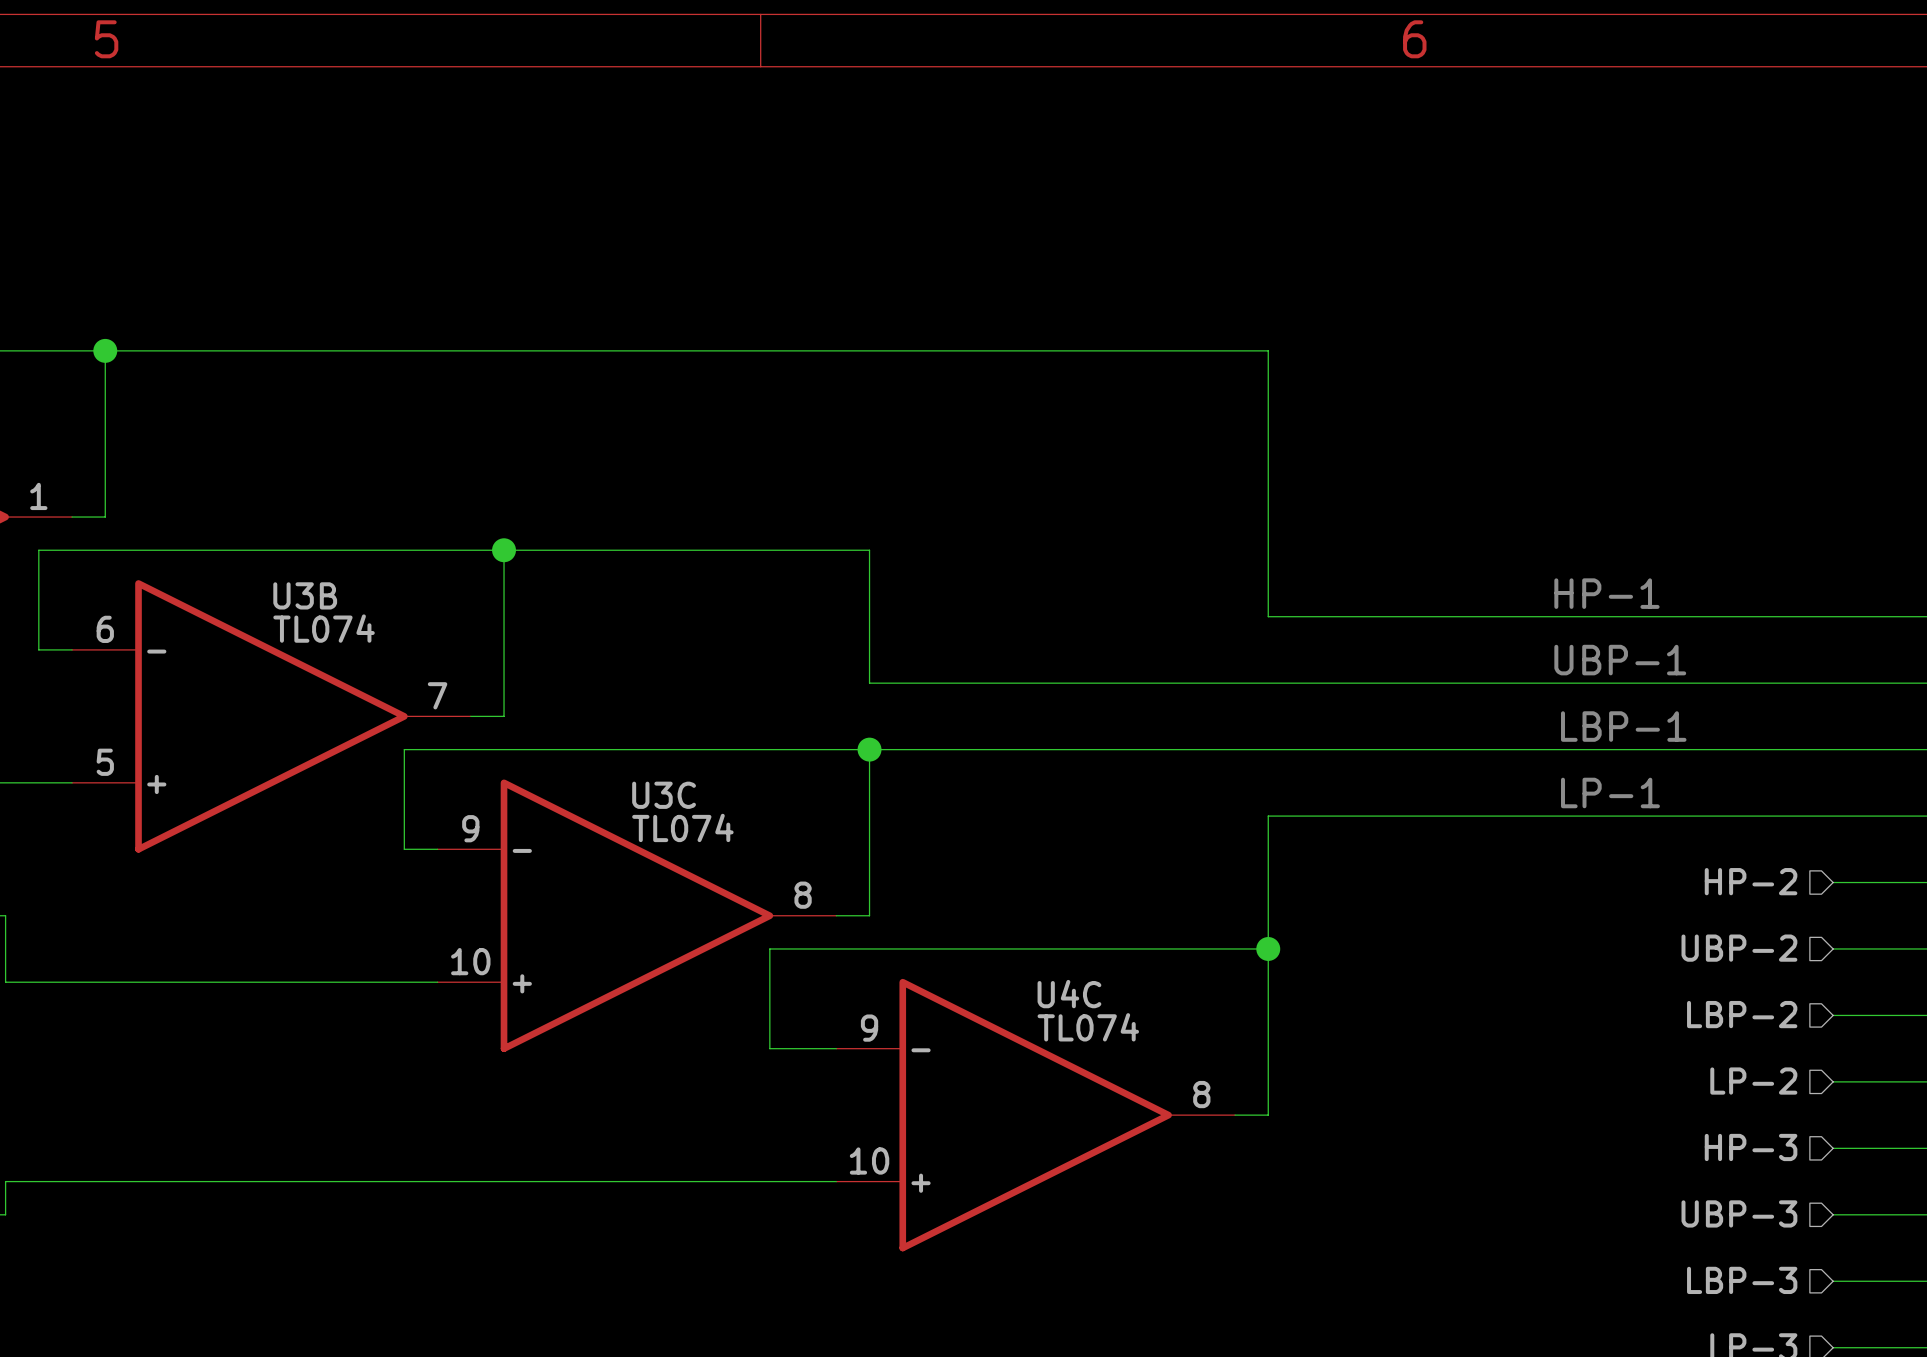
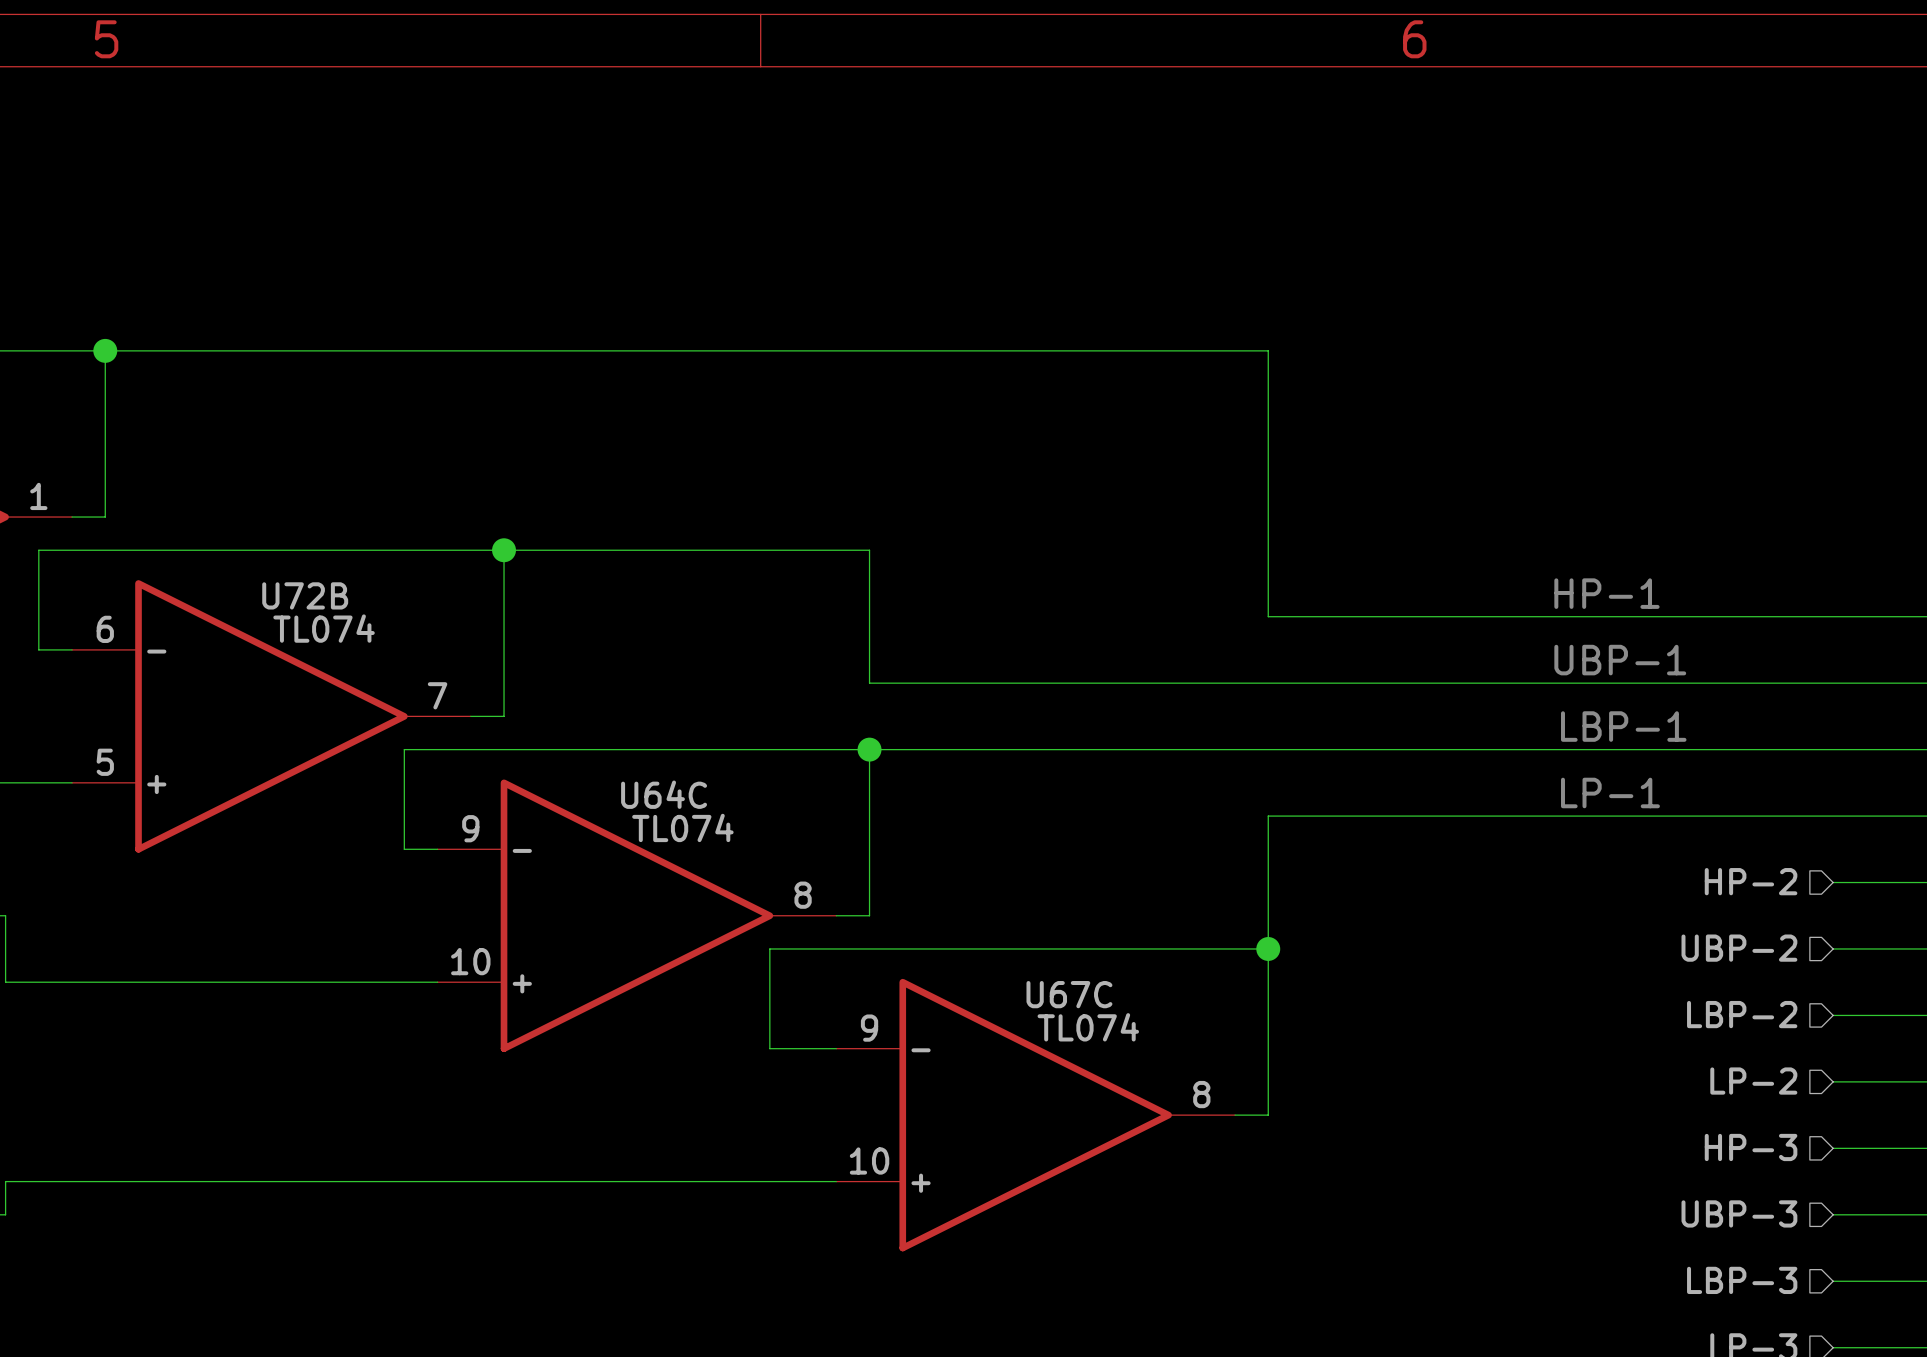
U3B name: U3B (305, 595) -> U72B (305, 595)
U3C name: U3C (664, 795) -> U64C (664, 794)
U4C name: U4C (1069, 994) -> U67C (1069, 994)

